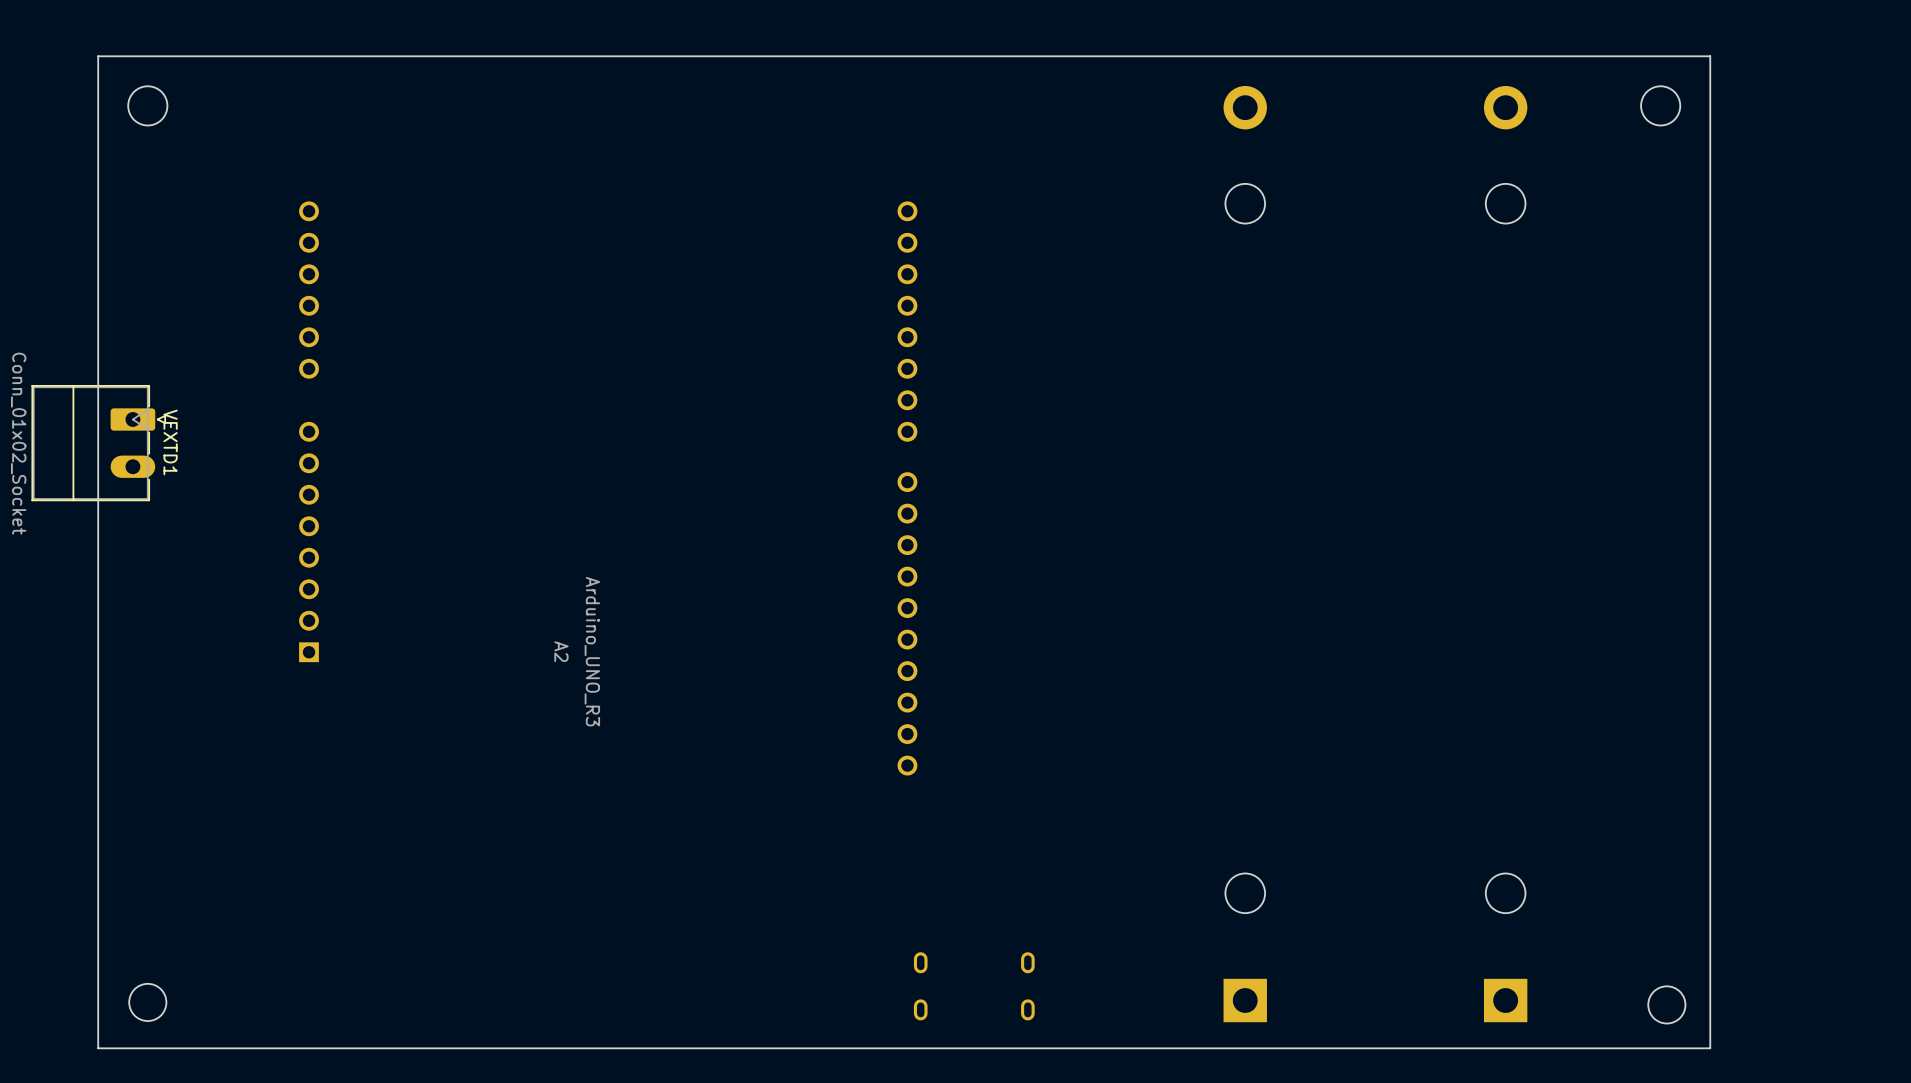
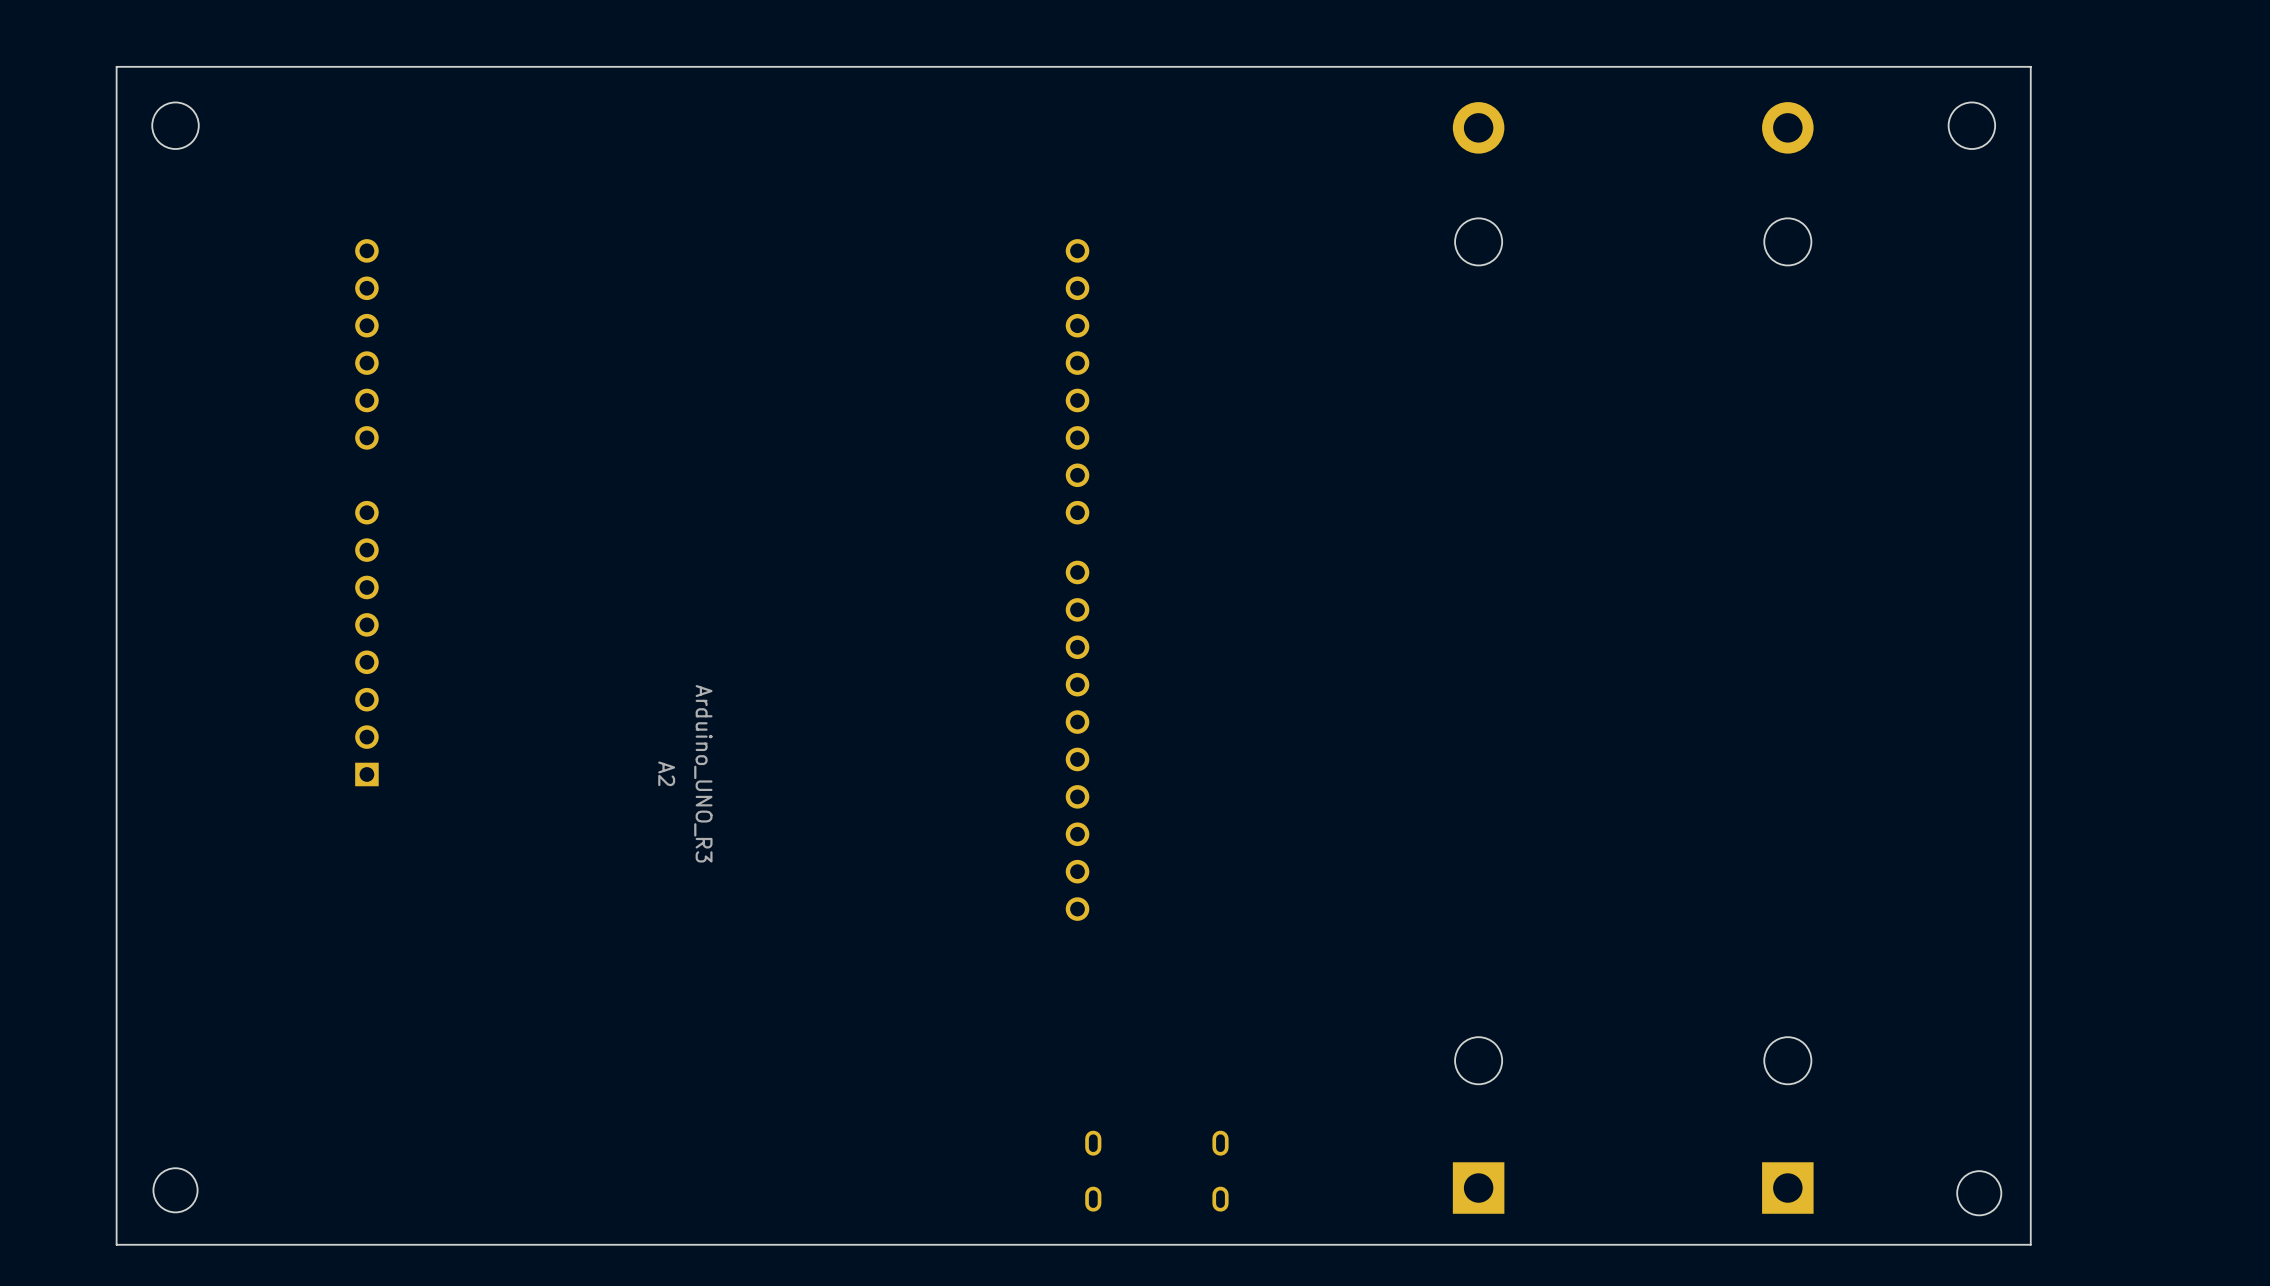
VEXTD1: Conn_01x02_Socket (98, 443) -> none

